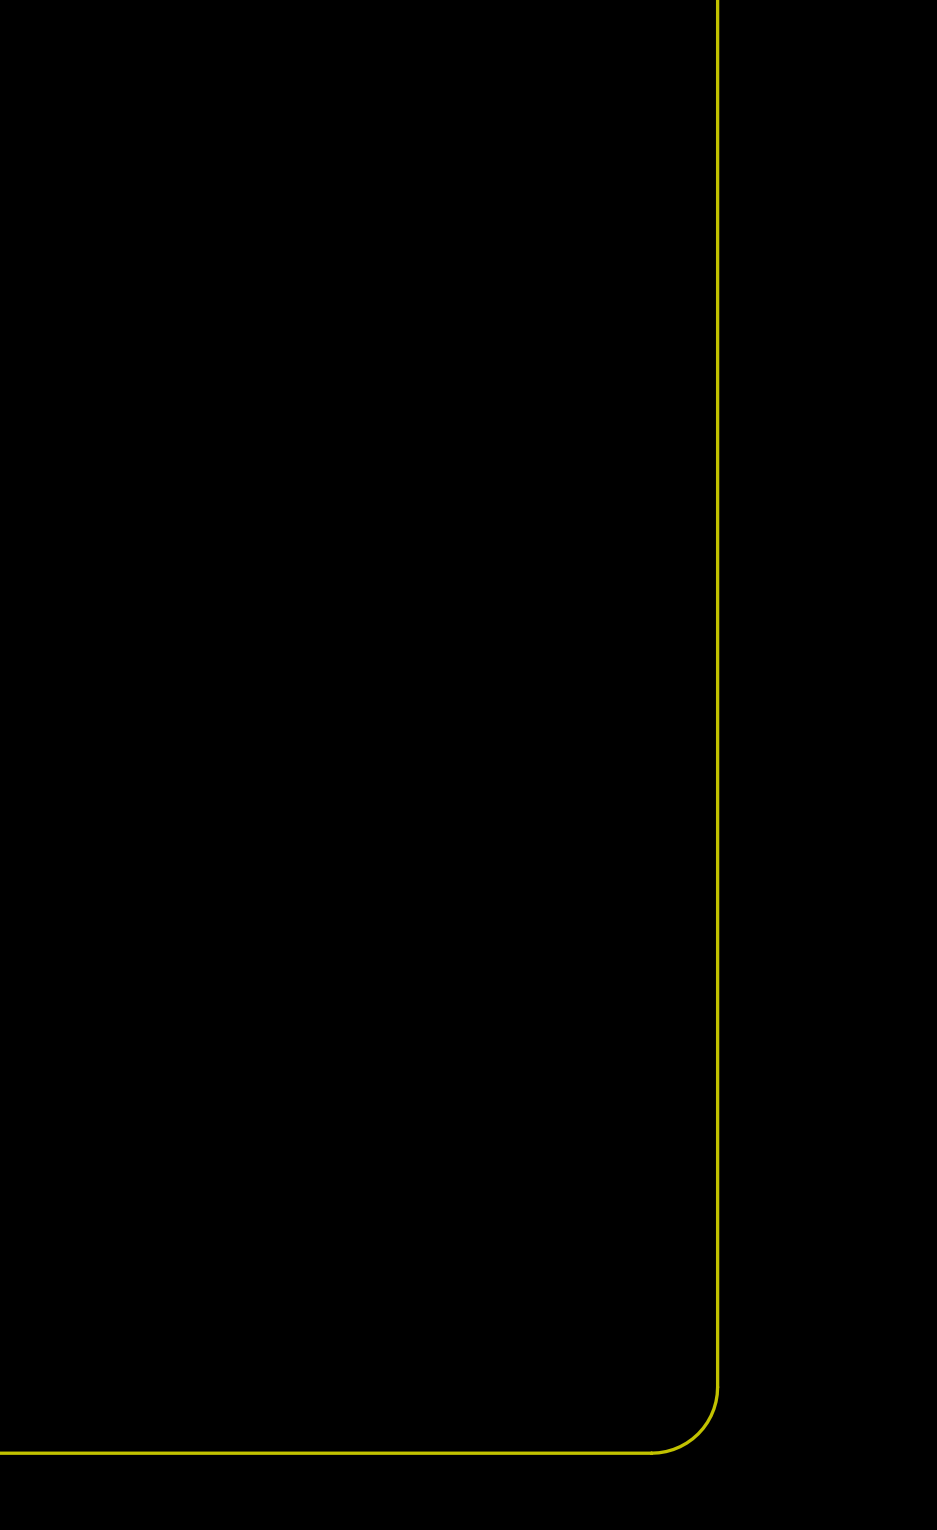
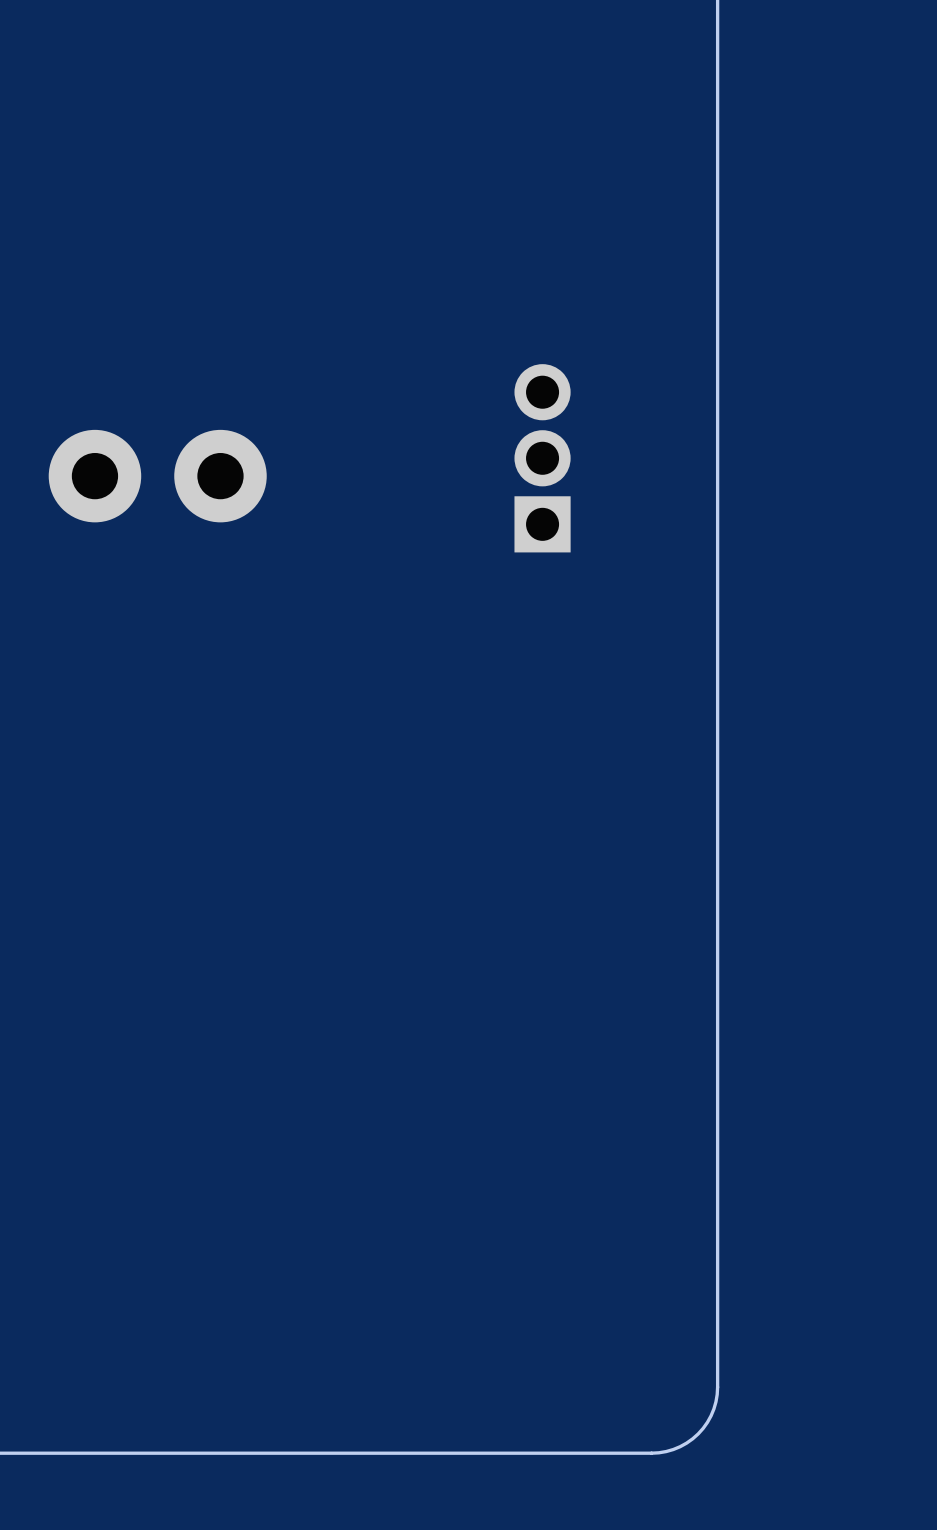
part: none -> (542, 458)
part: none -> (157, 476)

